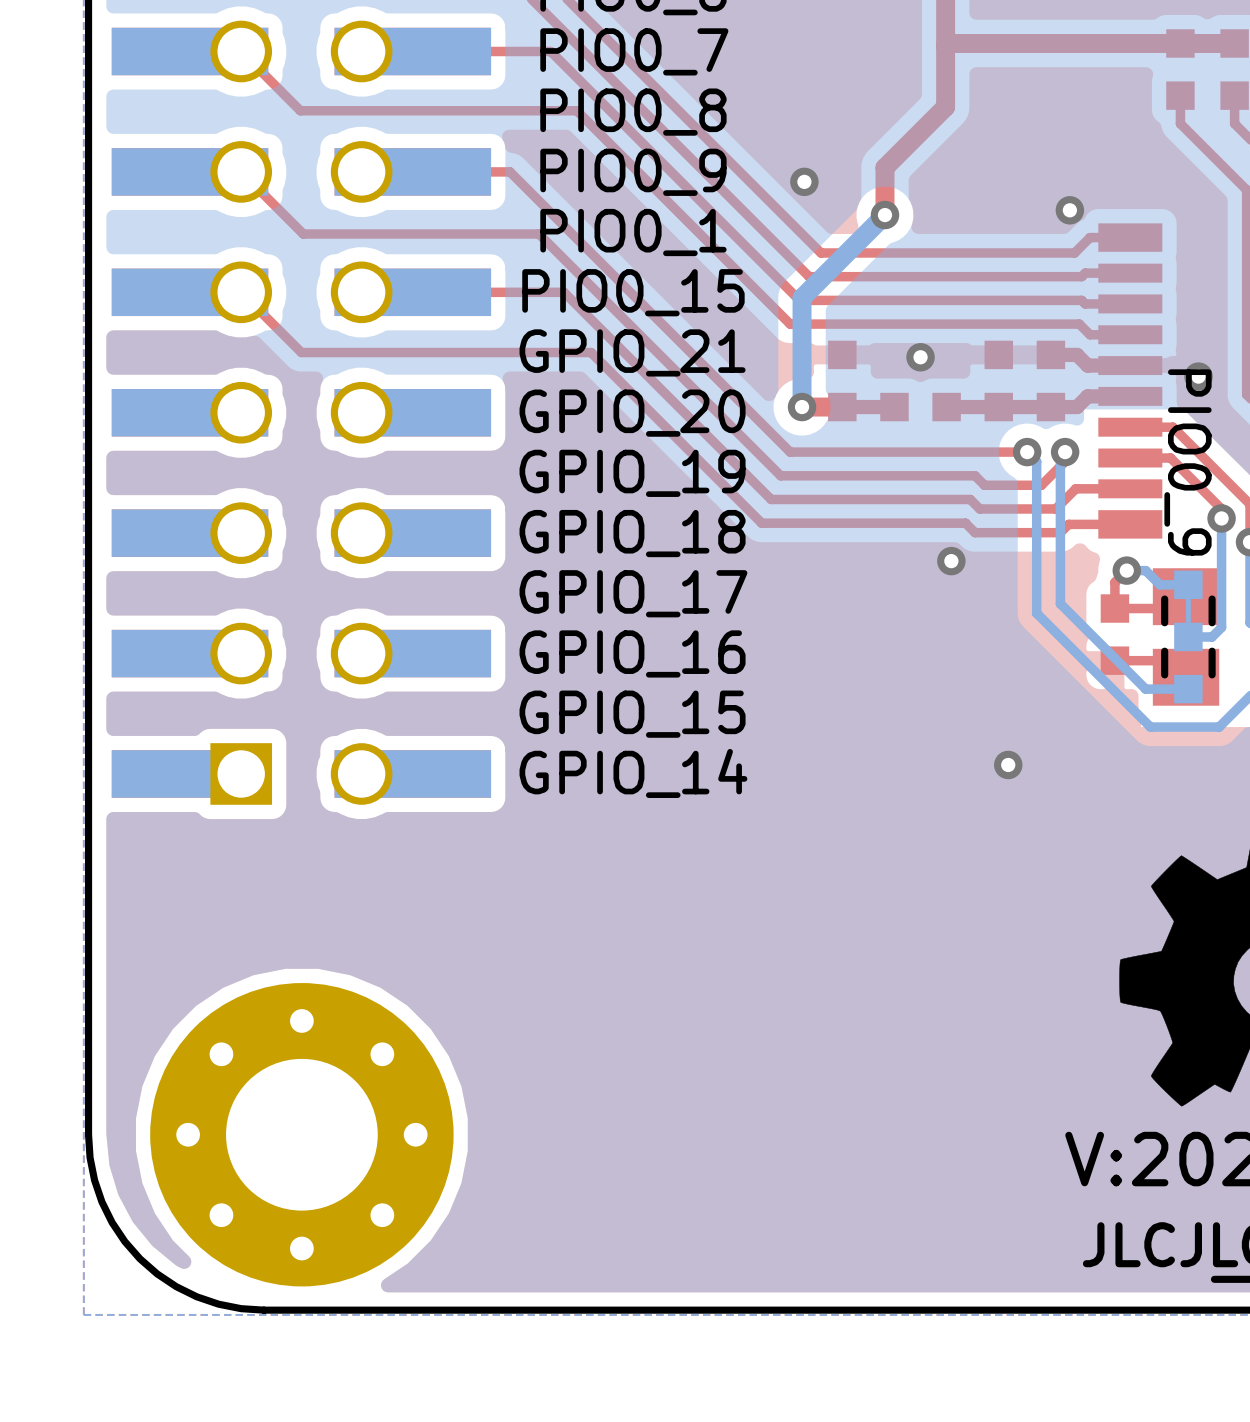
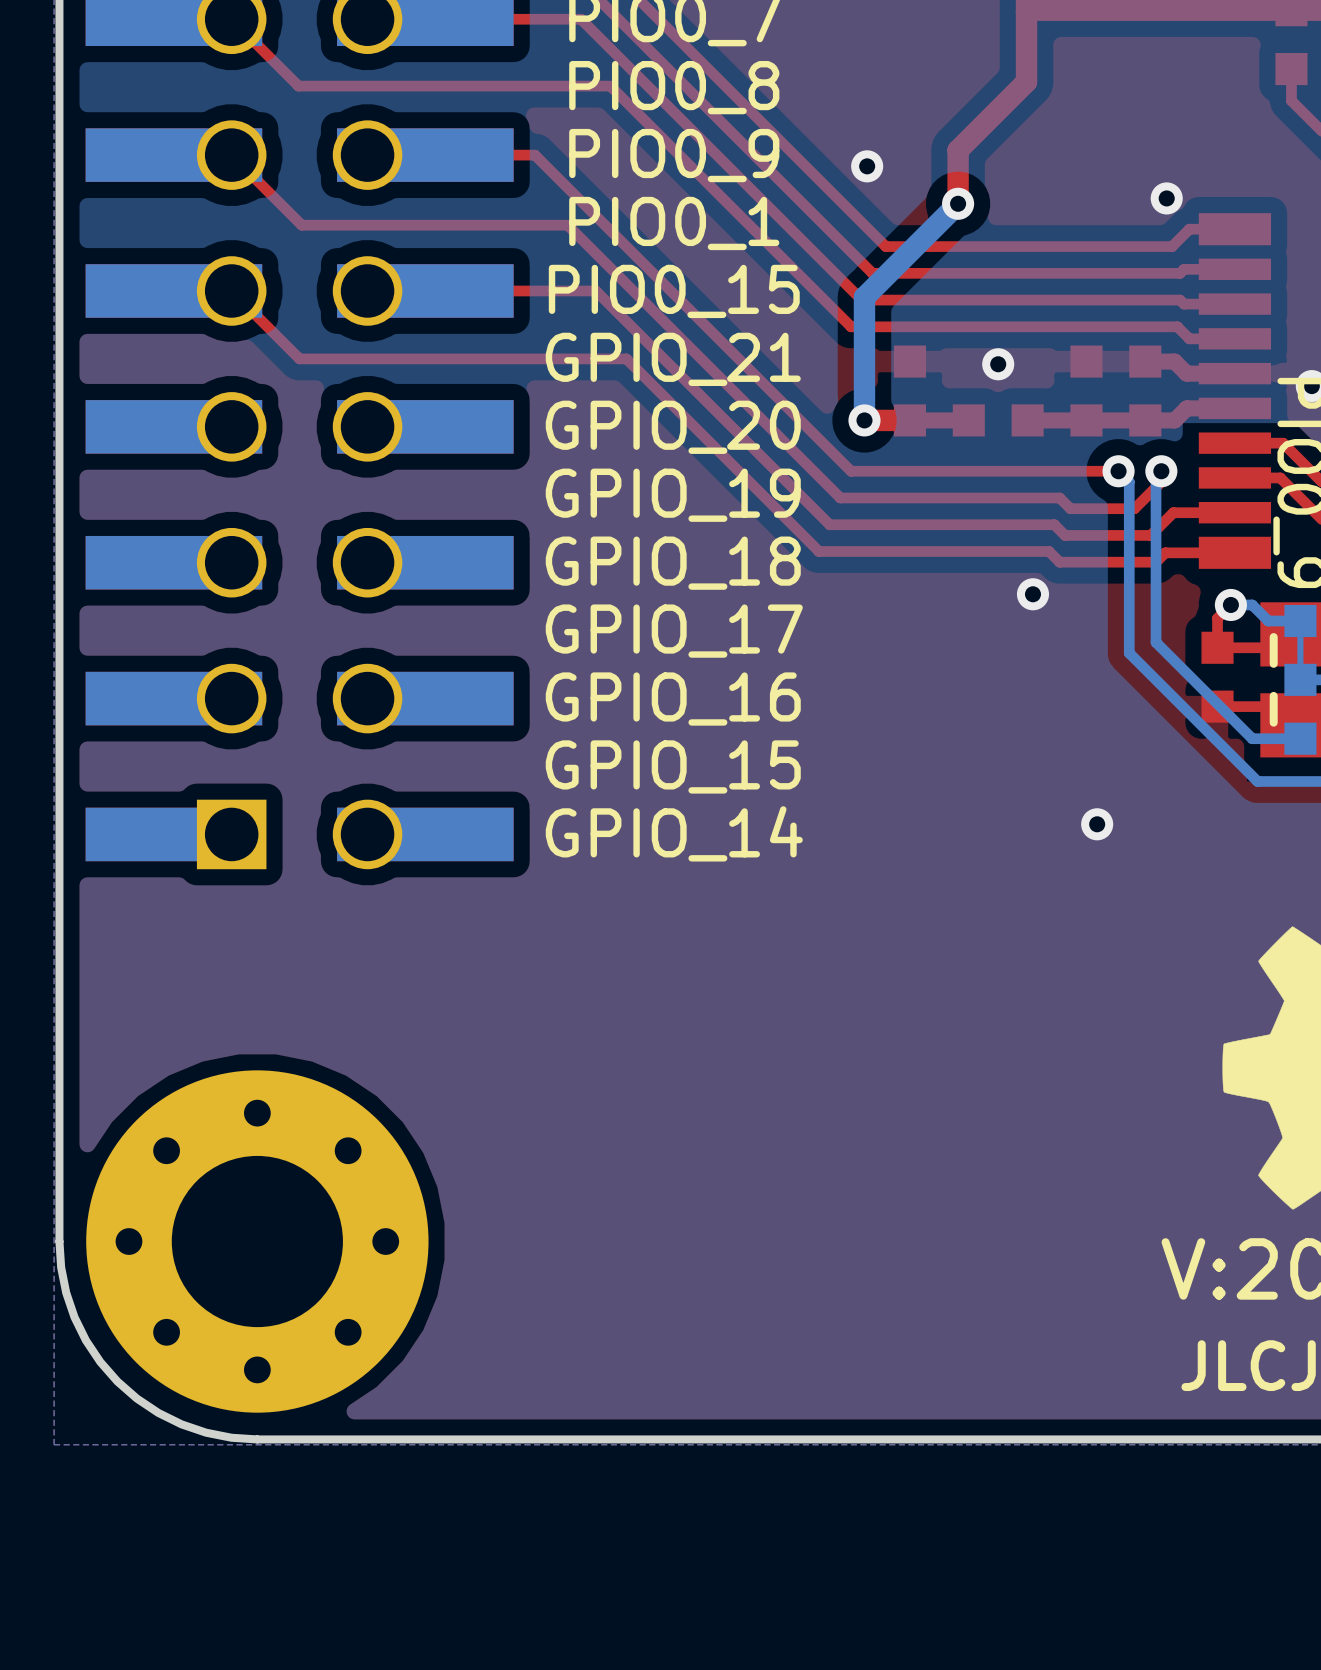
part position: (301, 1134) -> (257, 1241)

